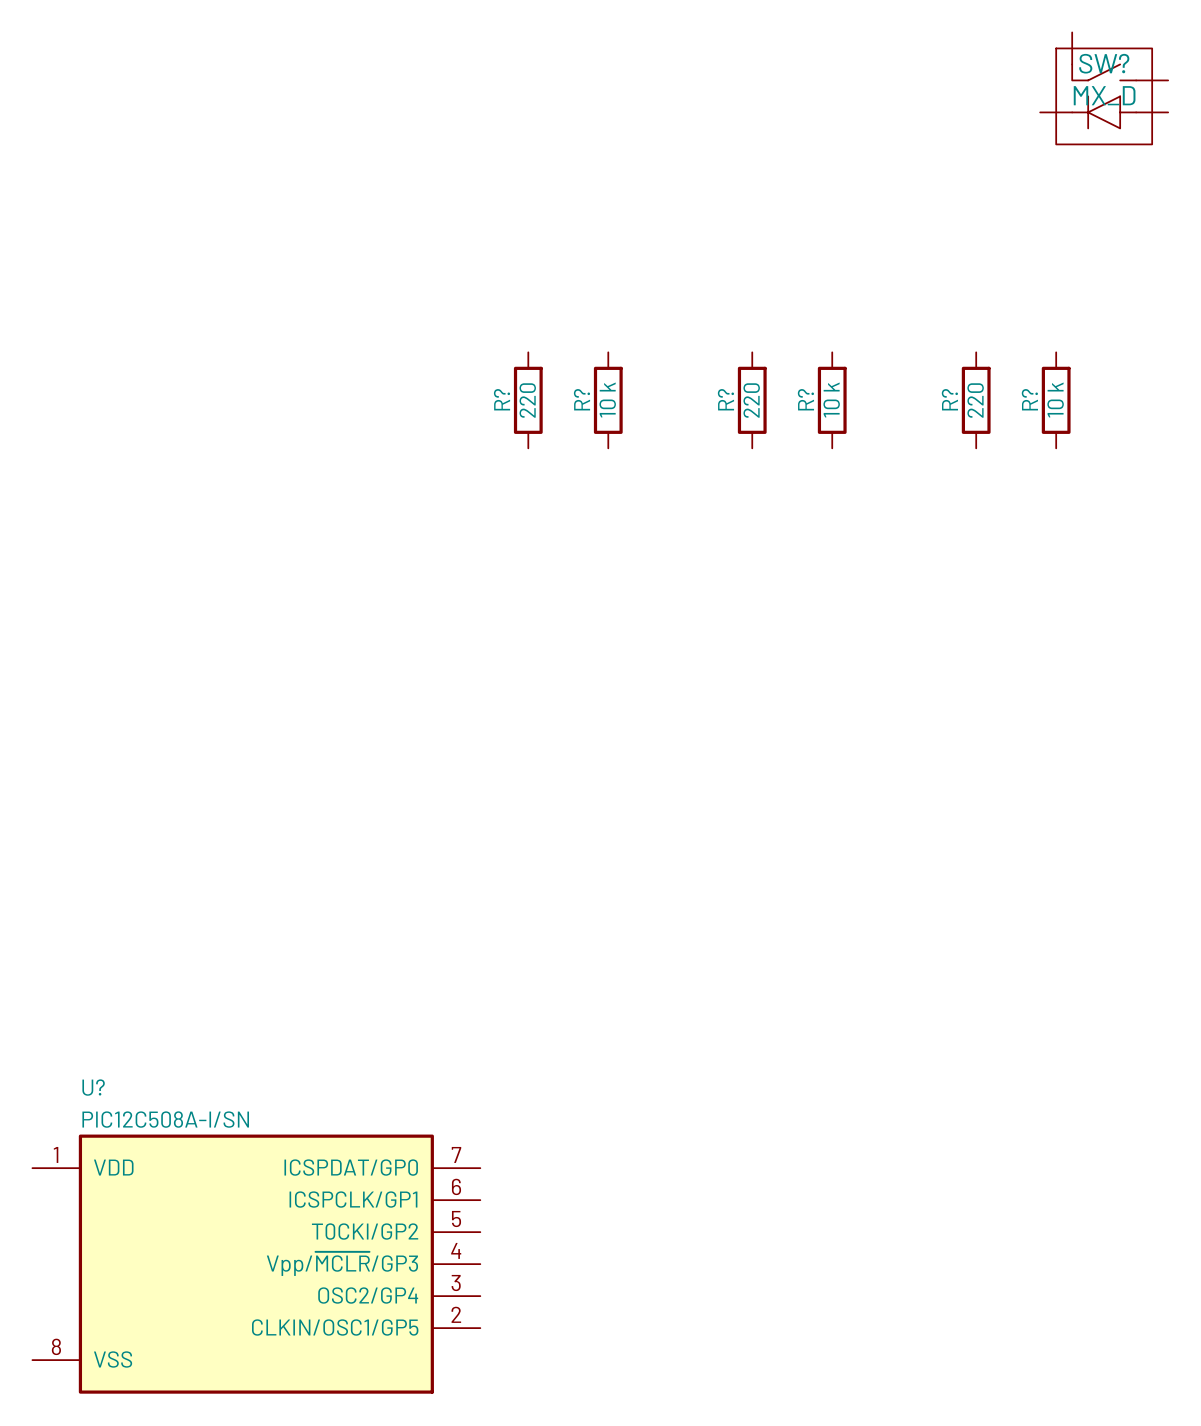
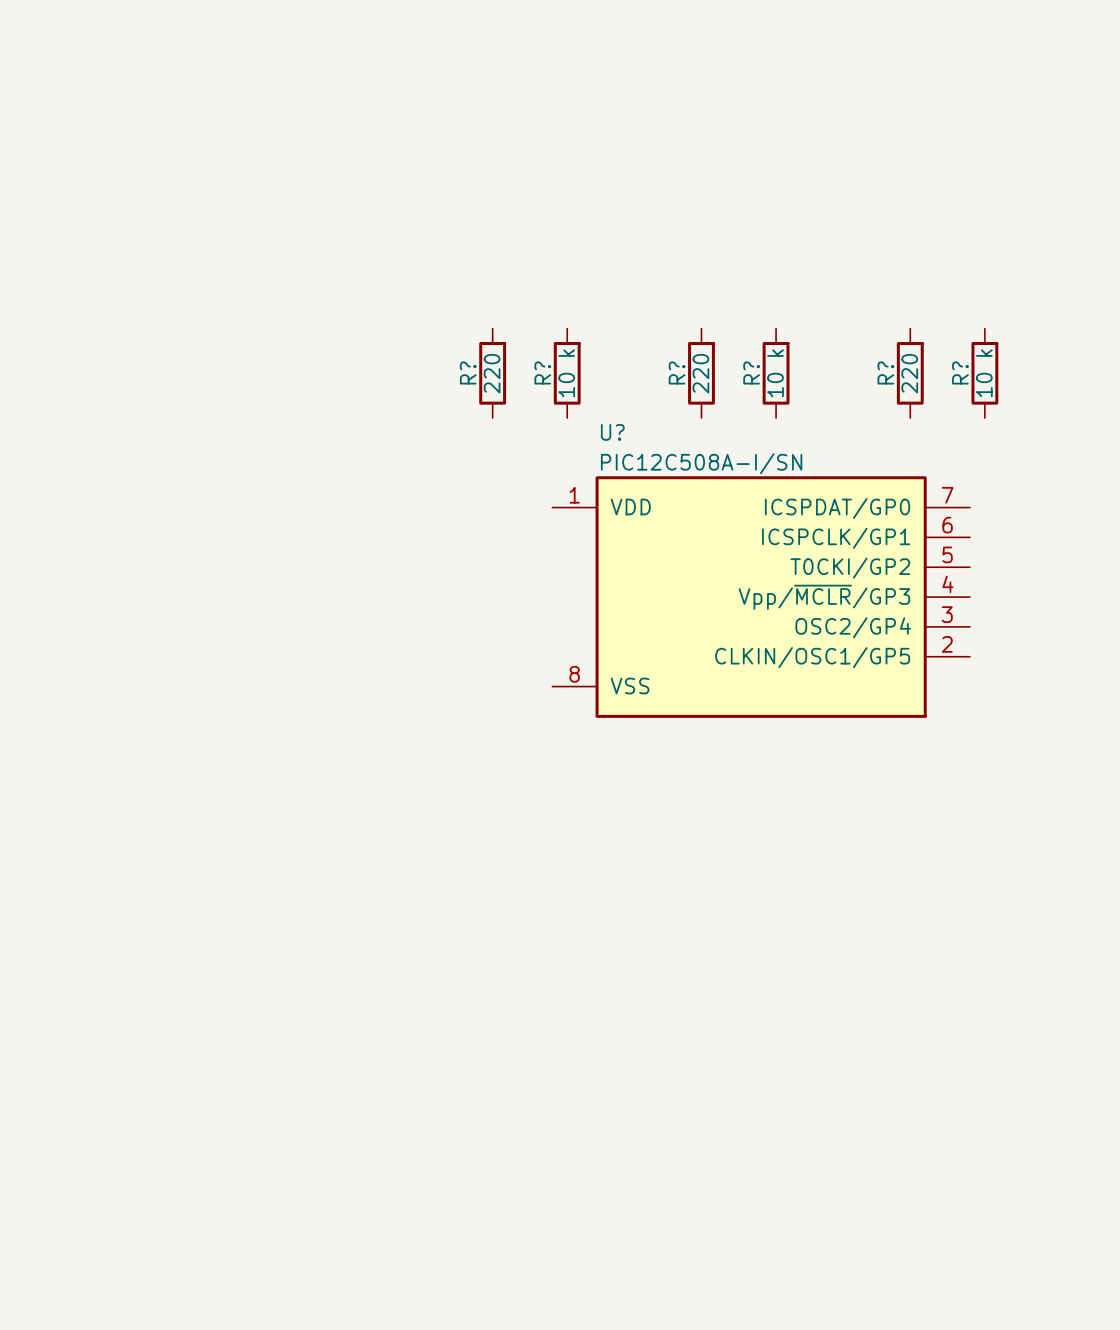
SW?: MX_D (1104, 88) -> none
U?: none -> PIC12C508A-I/SN (761, 597)
U?: PIC12C508A-I/SN (256, 1264) -> none

